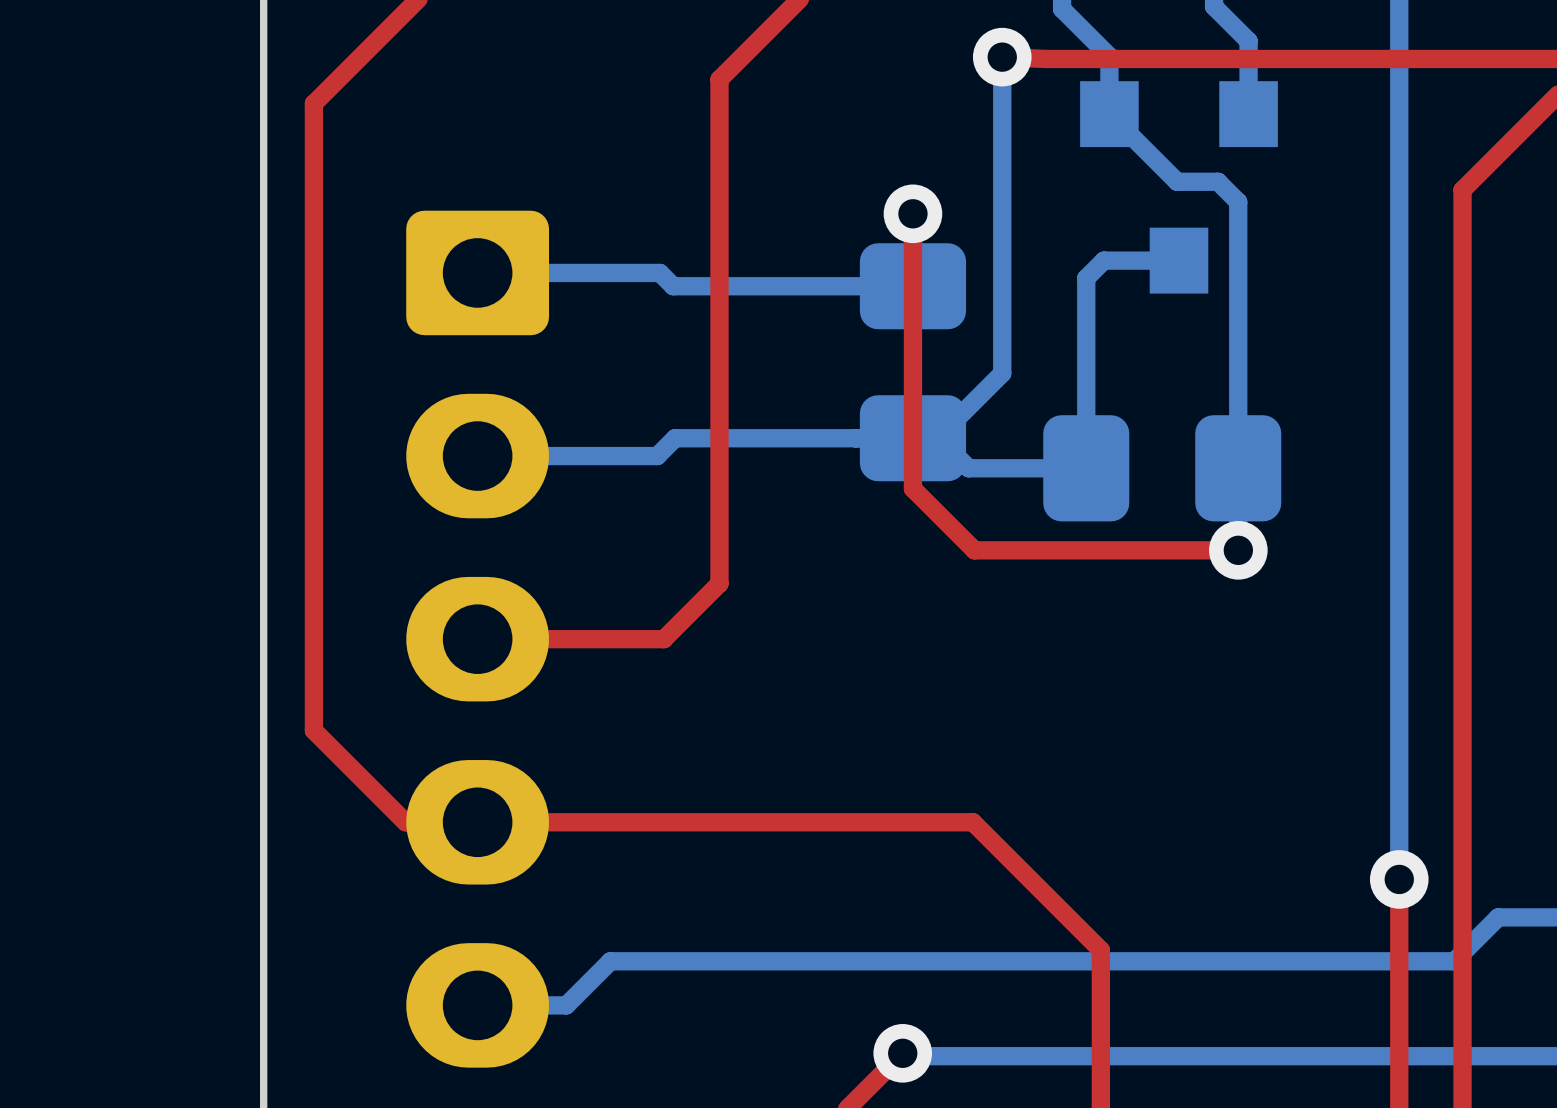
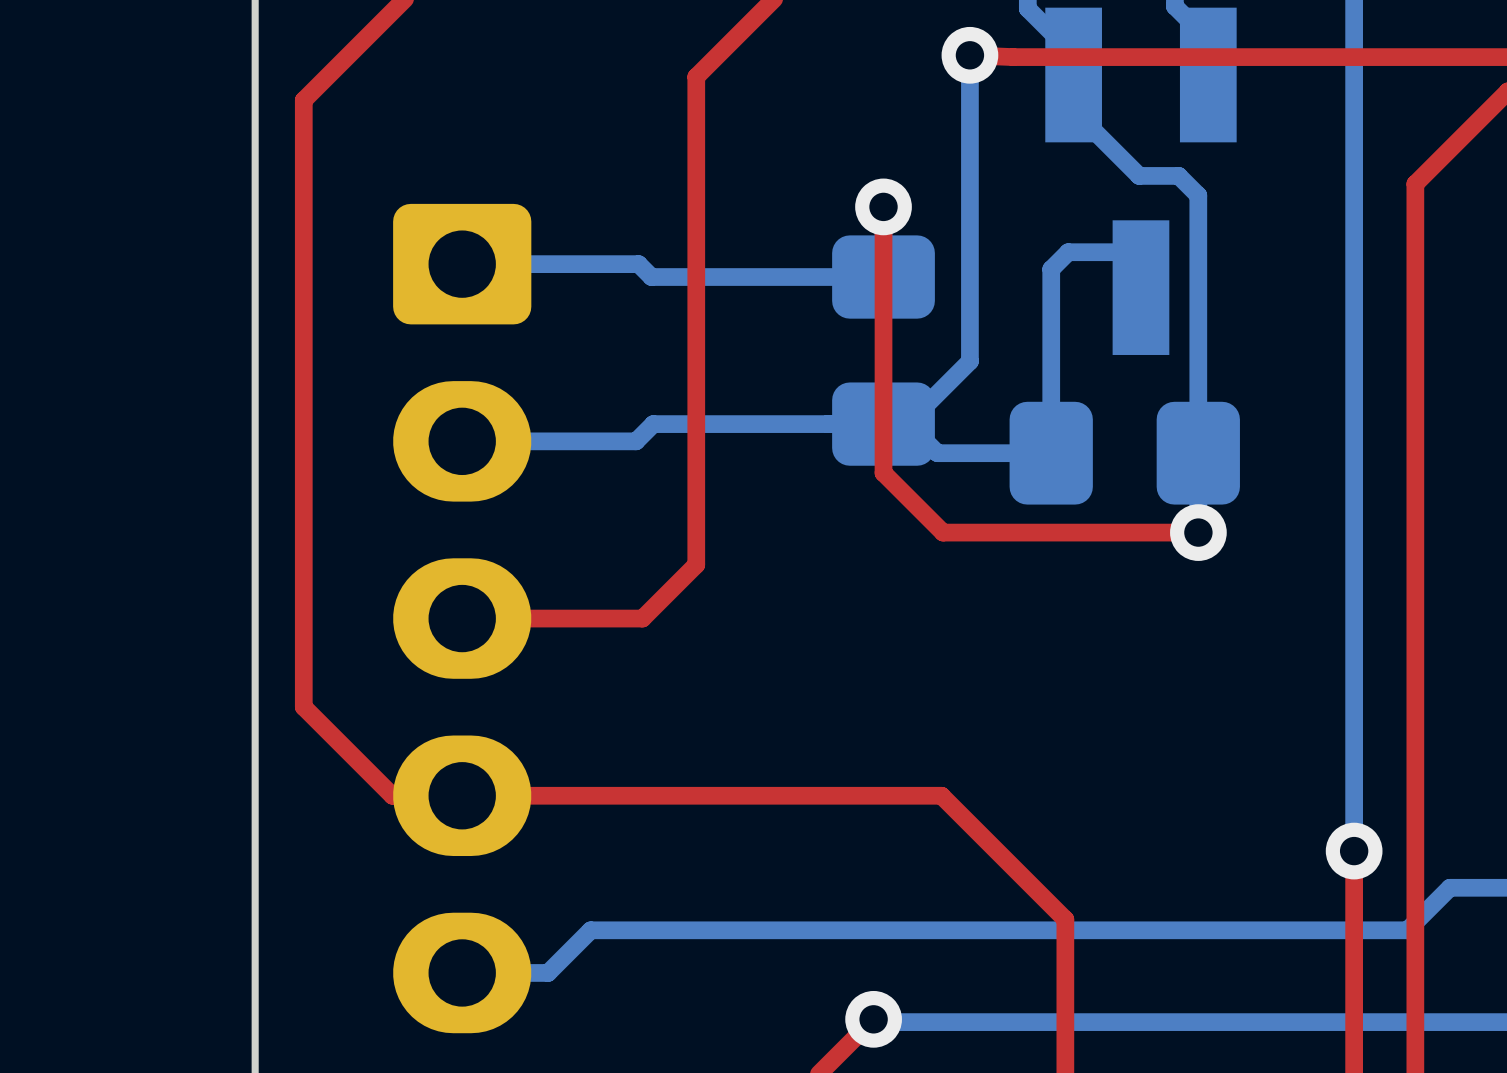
part footprint: [1080, 81, 1278, 294] -> [1045, 7, 1237, 355]

